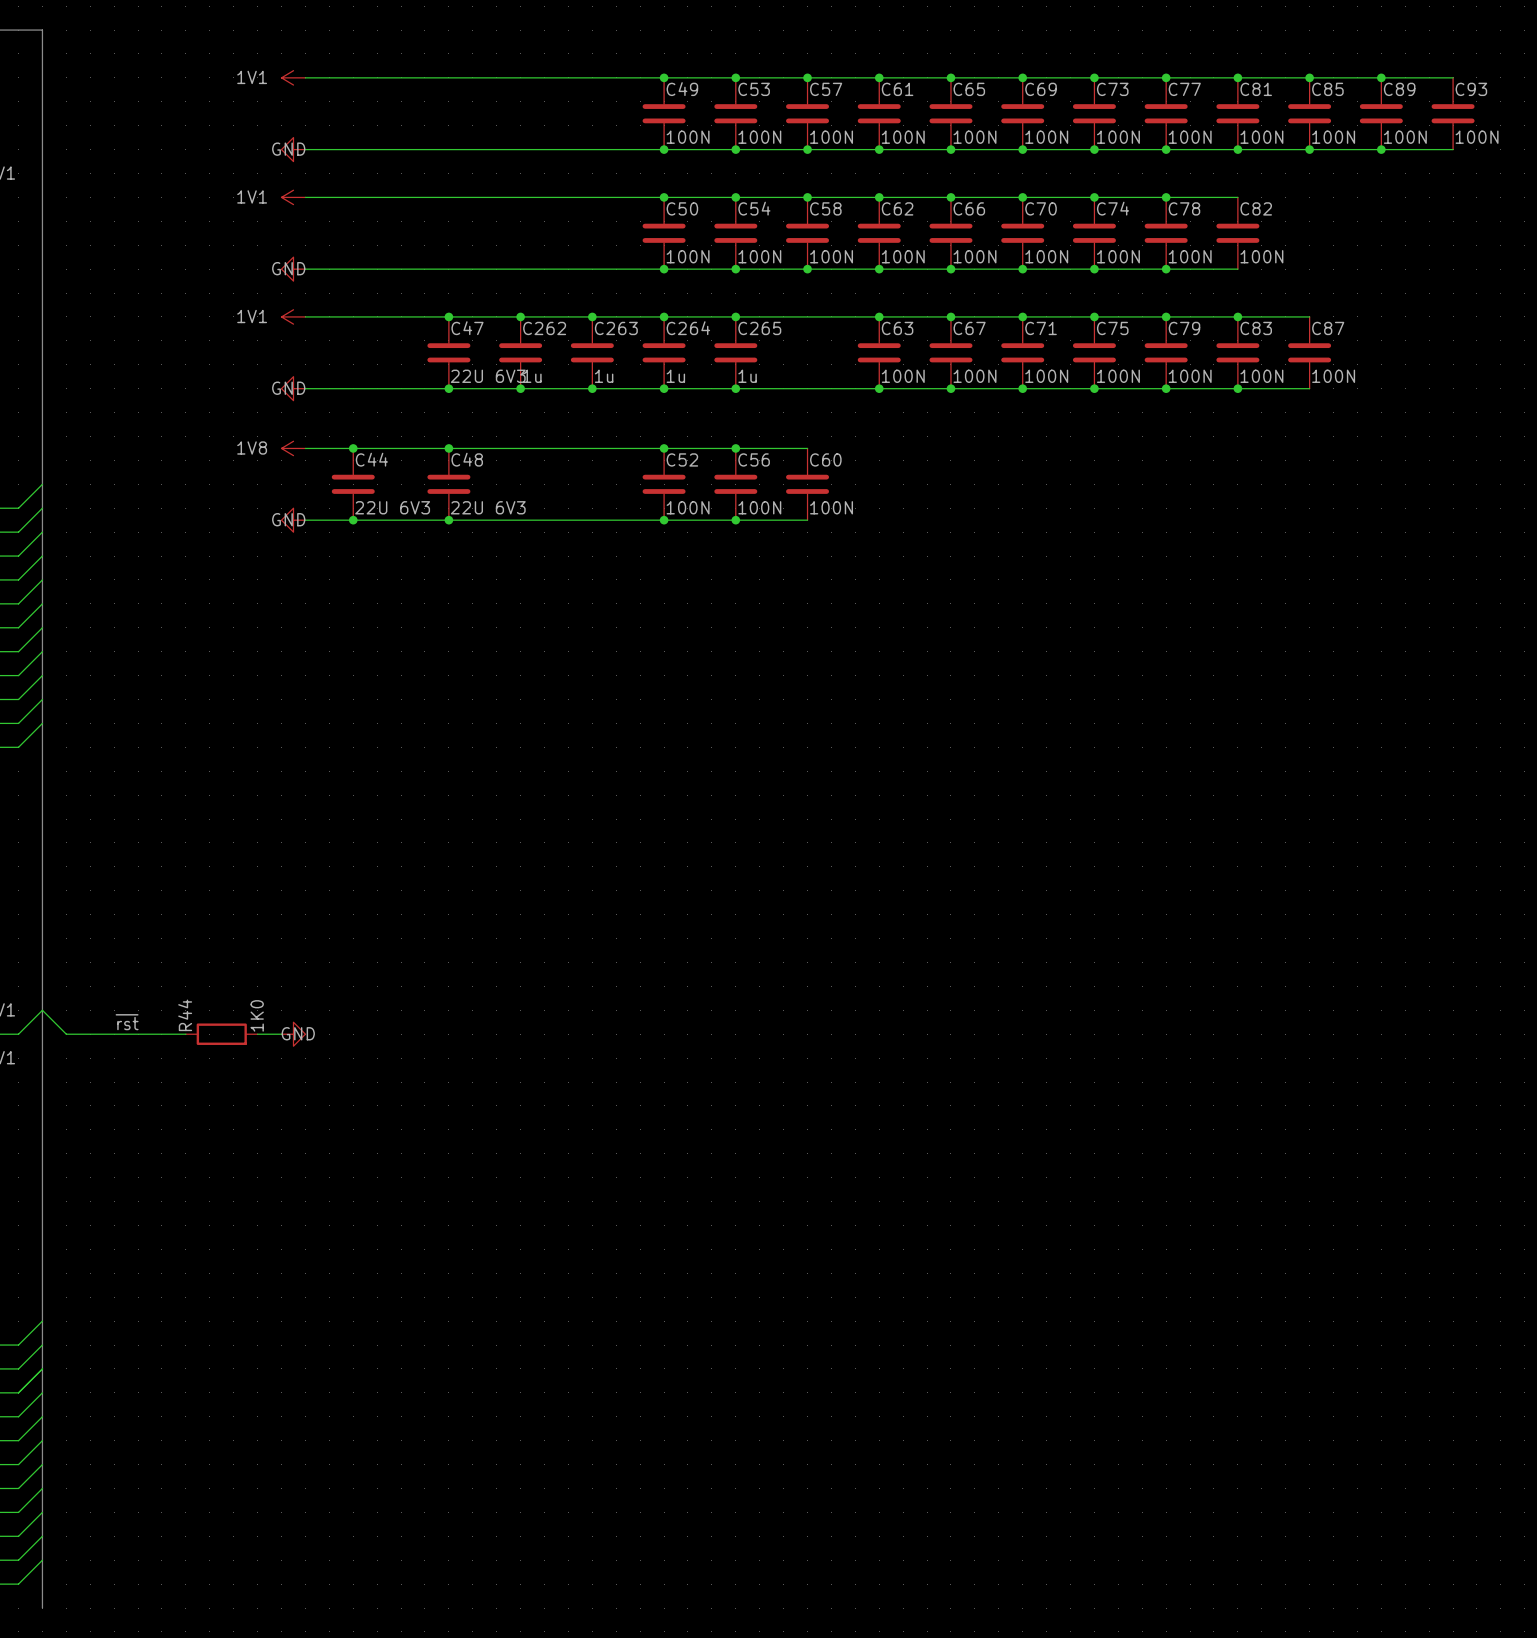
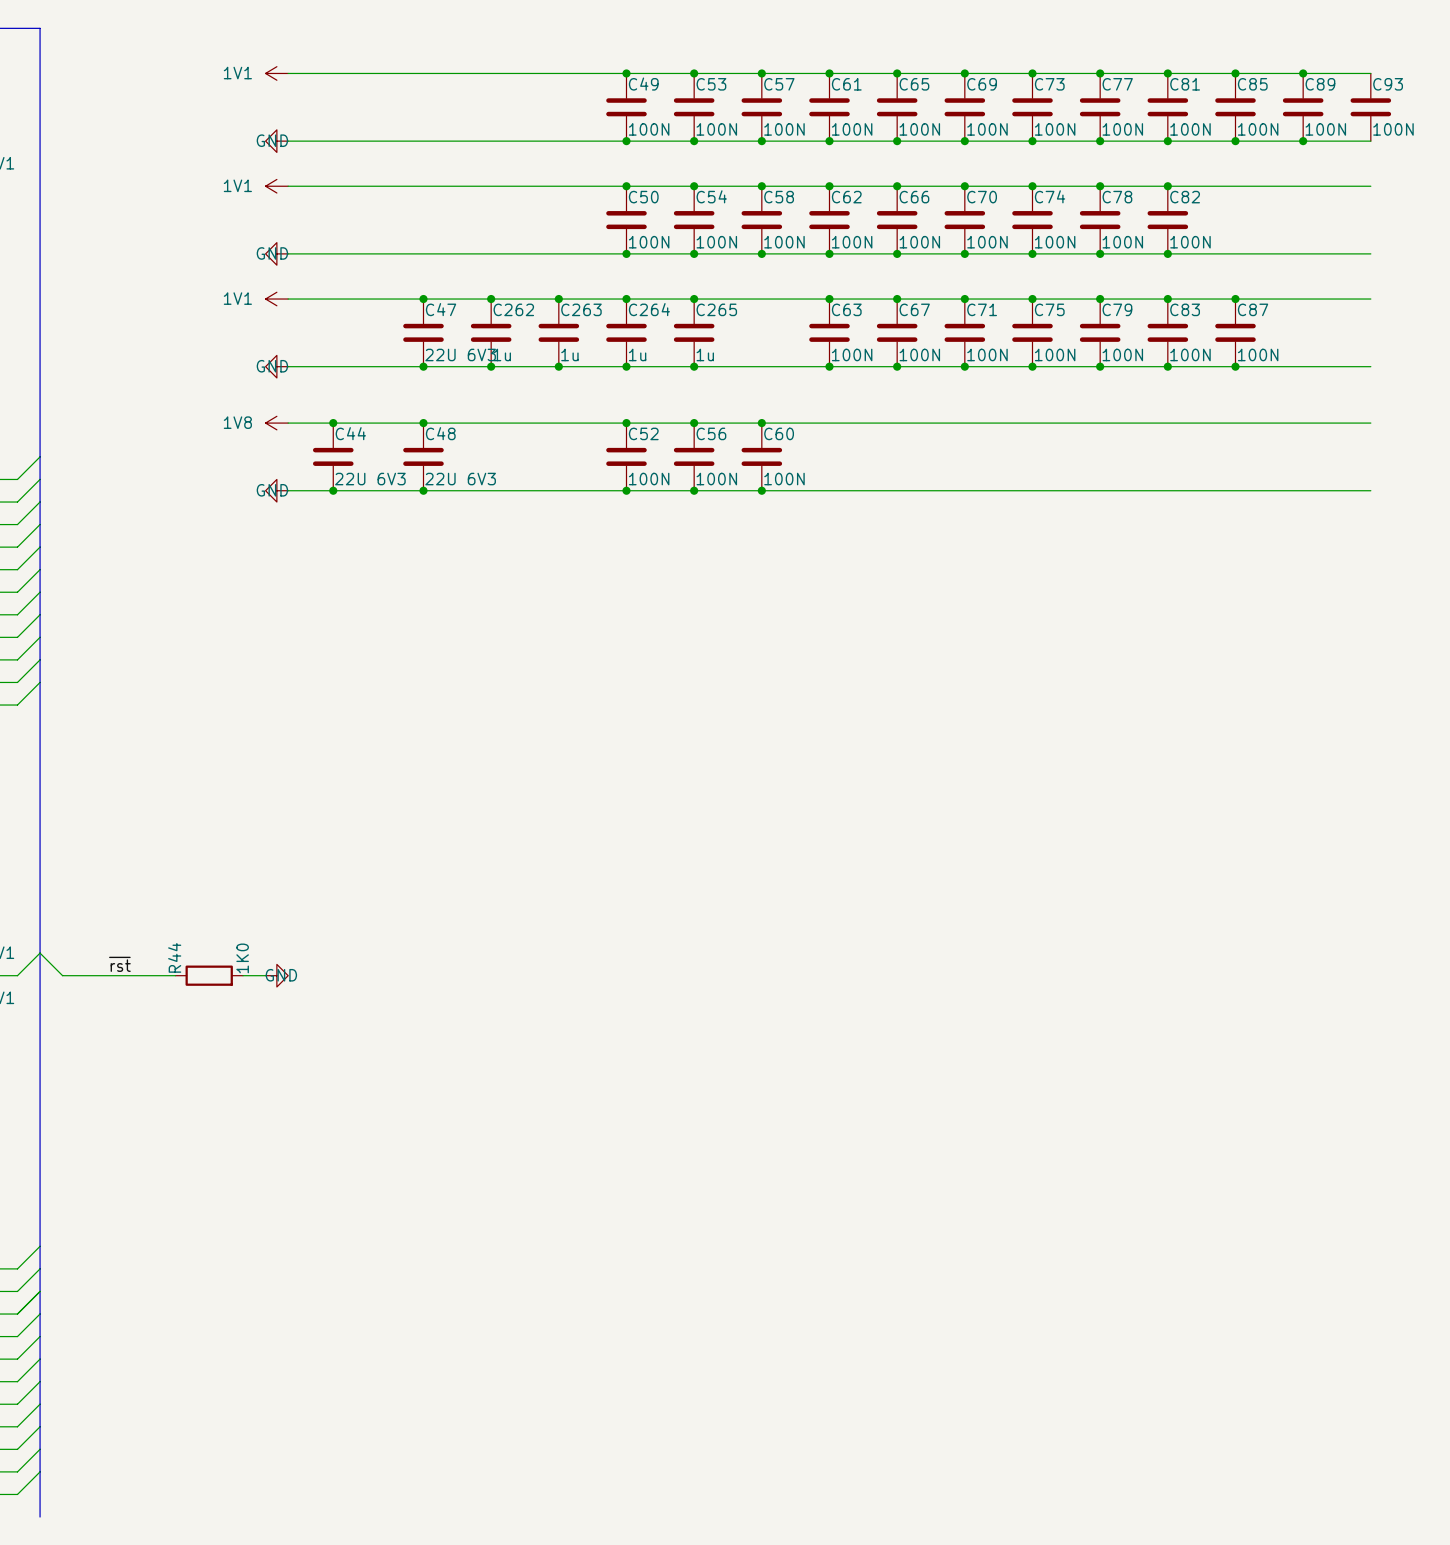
wire: none -> (1167, 186) (1370, 186)
junction: none -> (1167, 186)
wire: none -> (1167, 253) (1370, 253)
junction: none -> (1167, 253)
wire: none -> (1235, 299) (1370, 299)
junction: none -> (1235, 299)
wire: none -> (1235, 366) (1370, 366)
junction: none -> (1235, 366)
wire: none -> (761, 423) (1370, 423)
junction: none -> (761, 423)
wire: none -> (761, 490) (1370, 490)
junction: none -> (761, 490)

